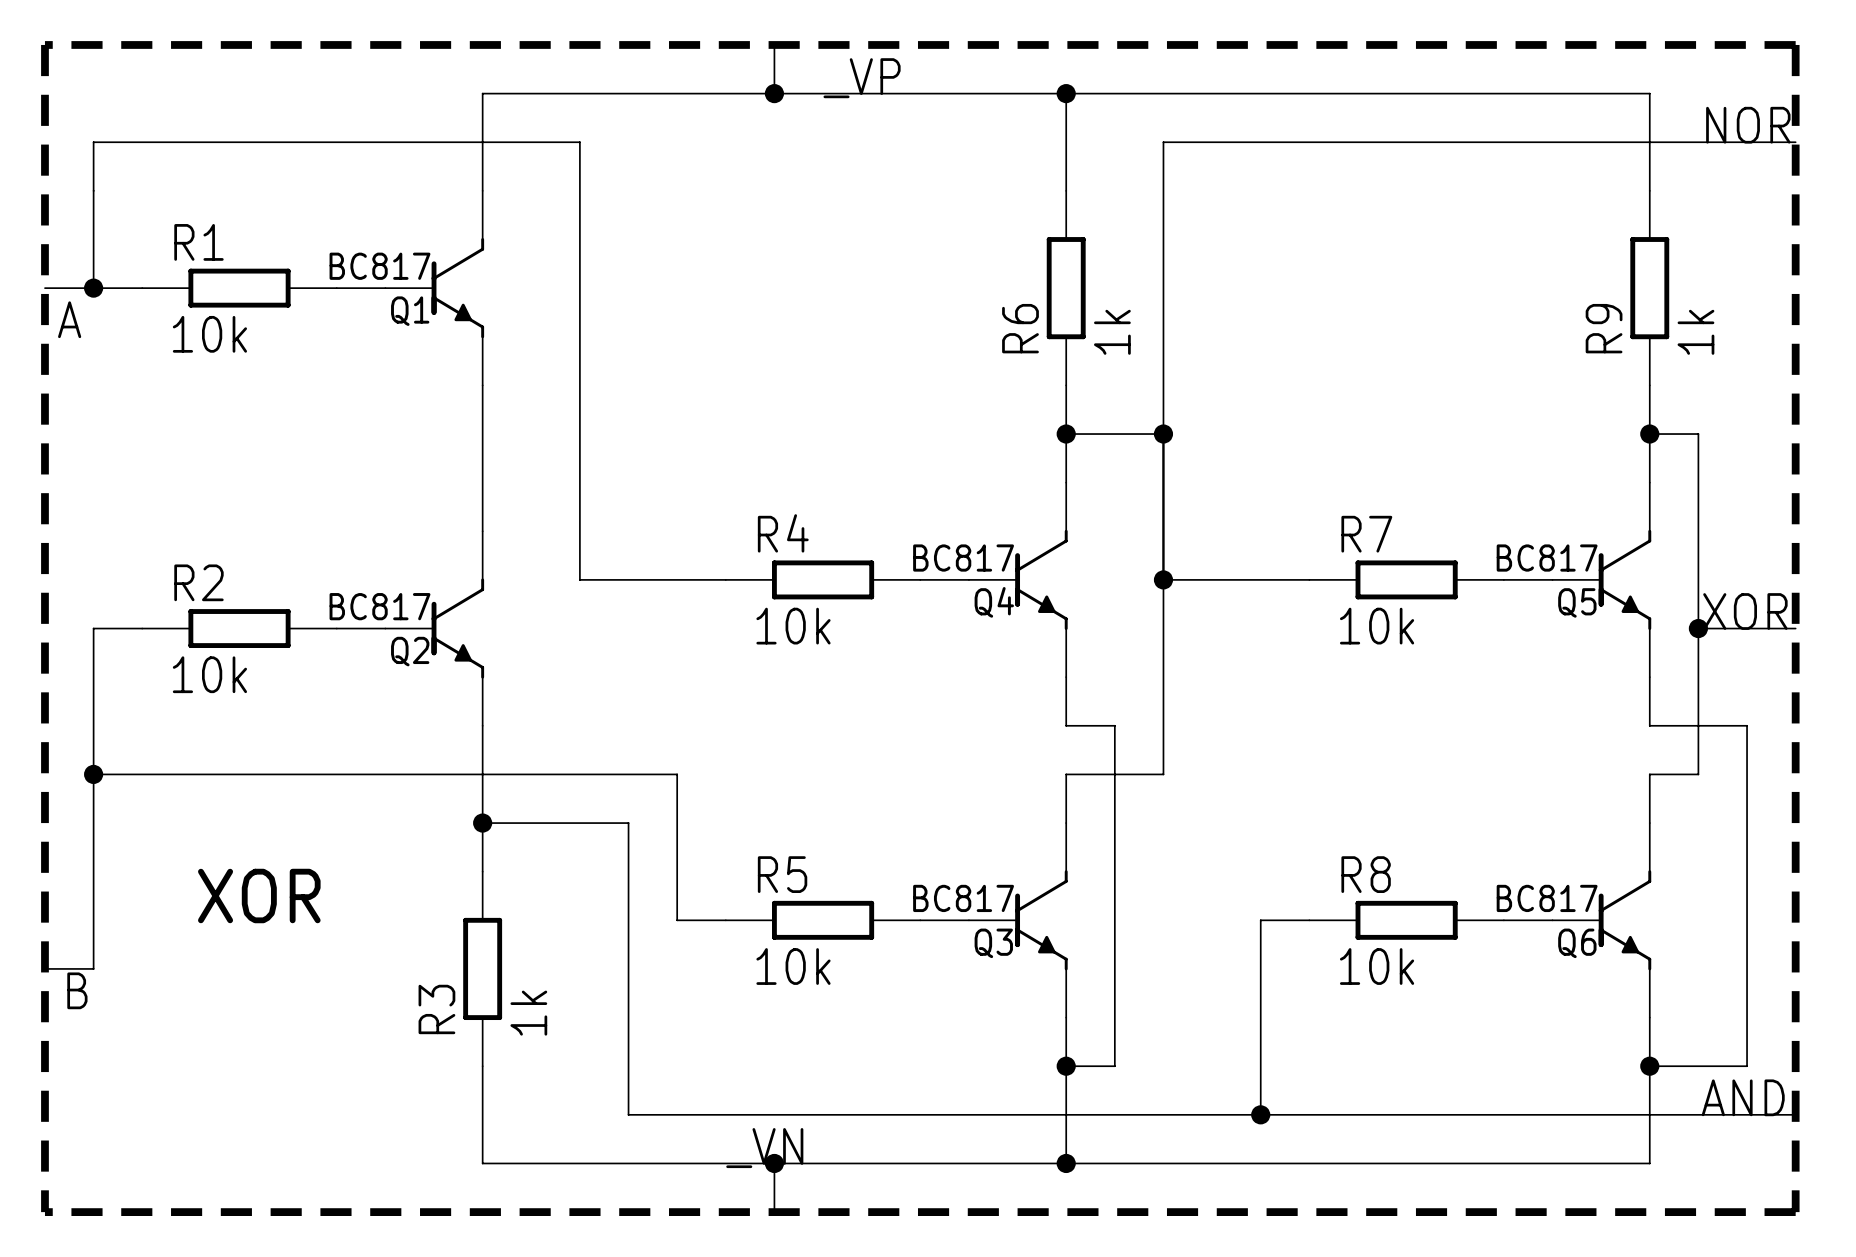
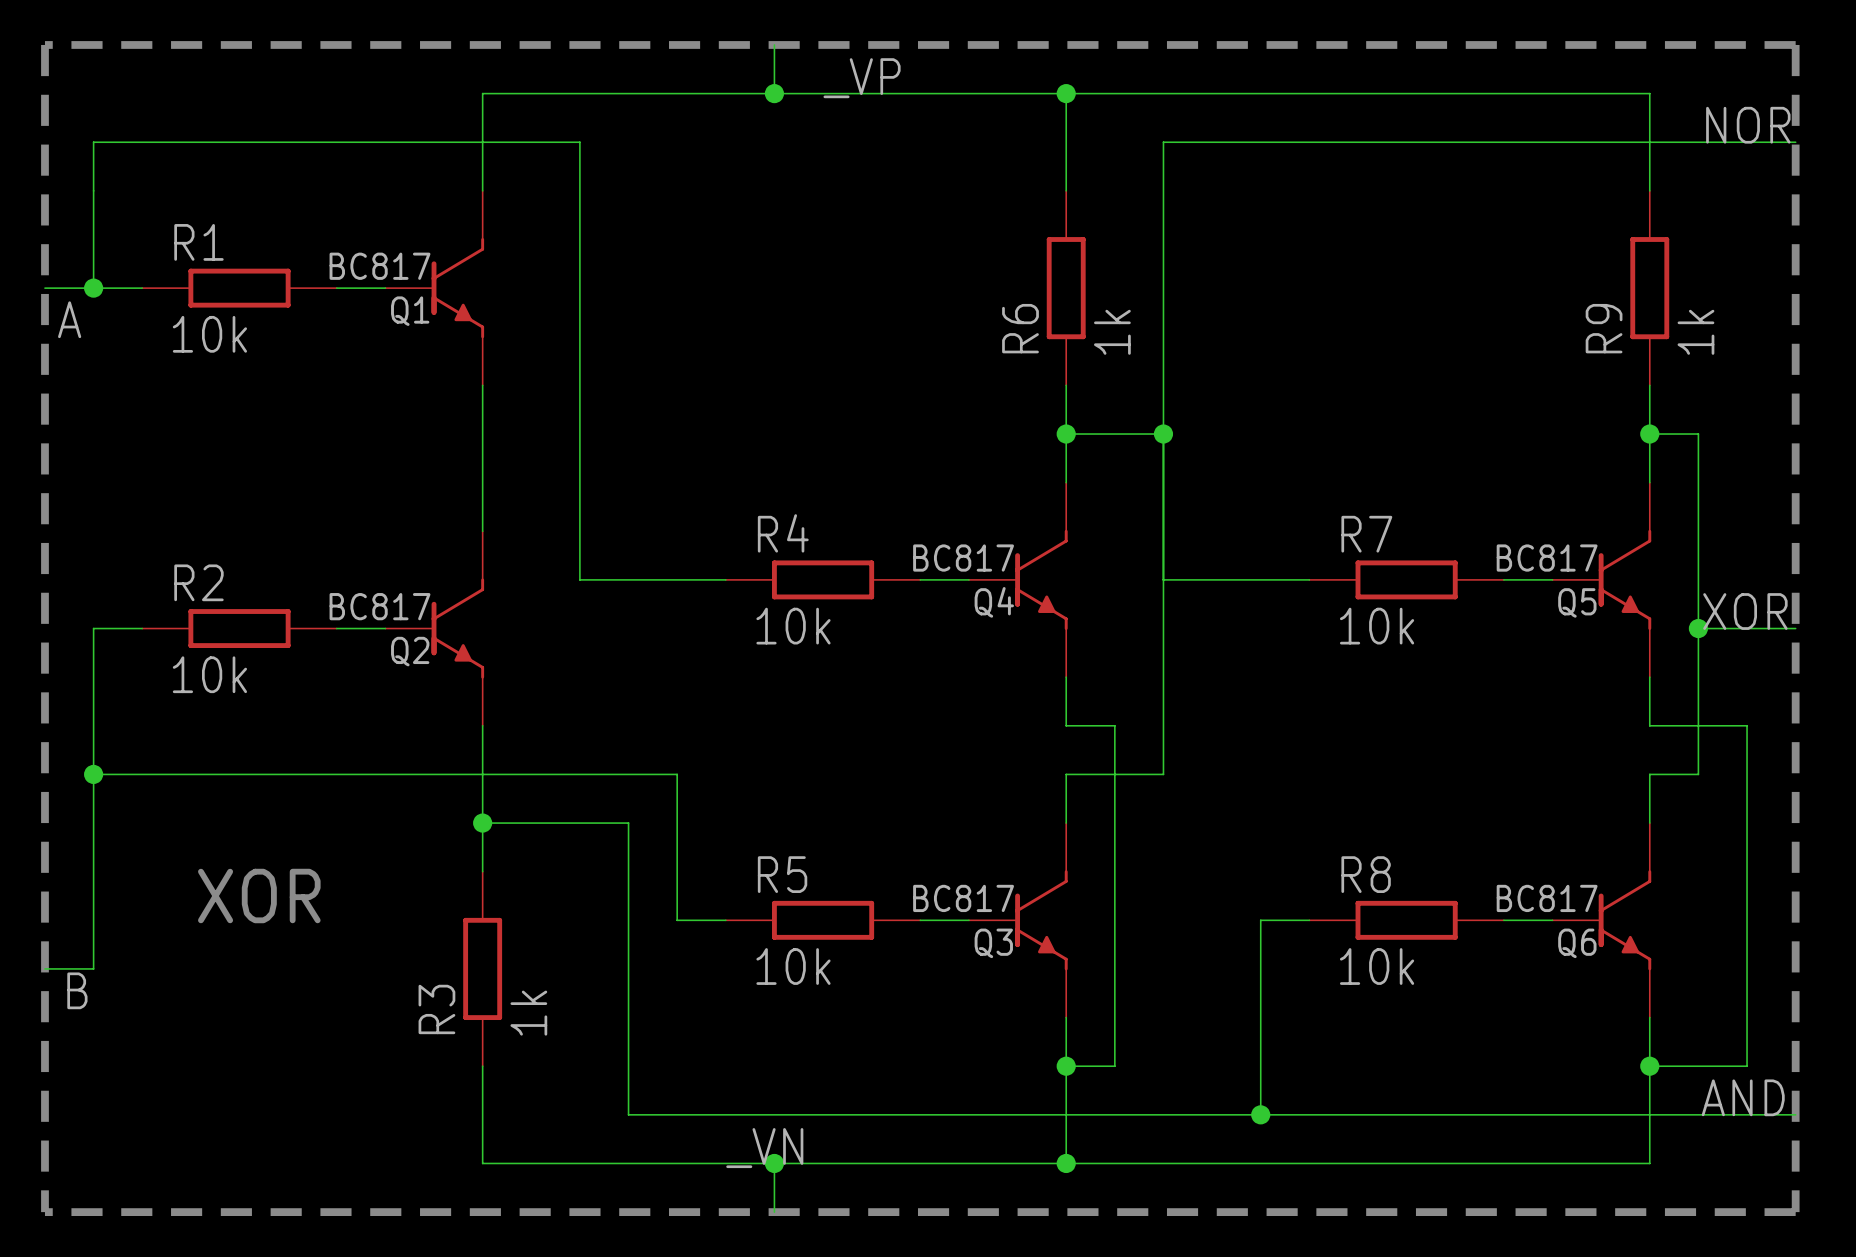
junction: (1163, 579) -> none

